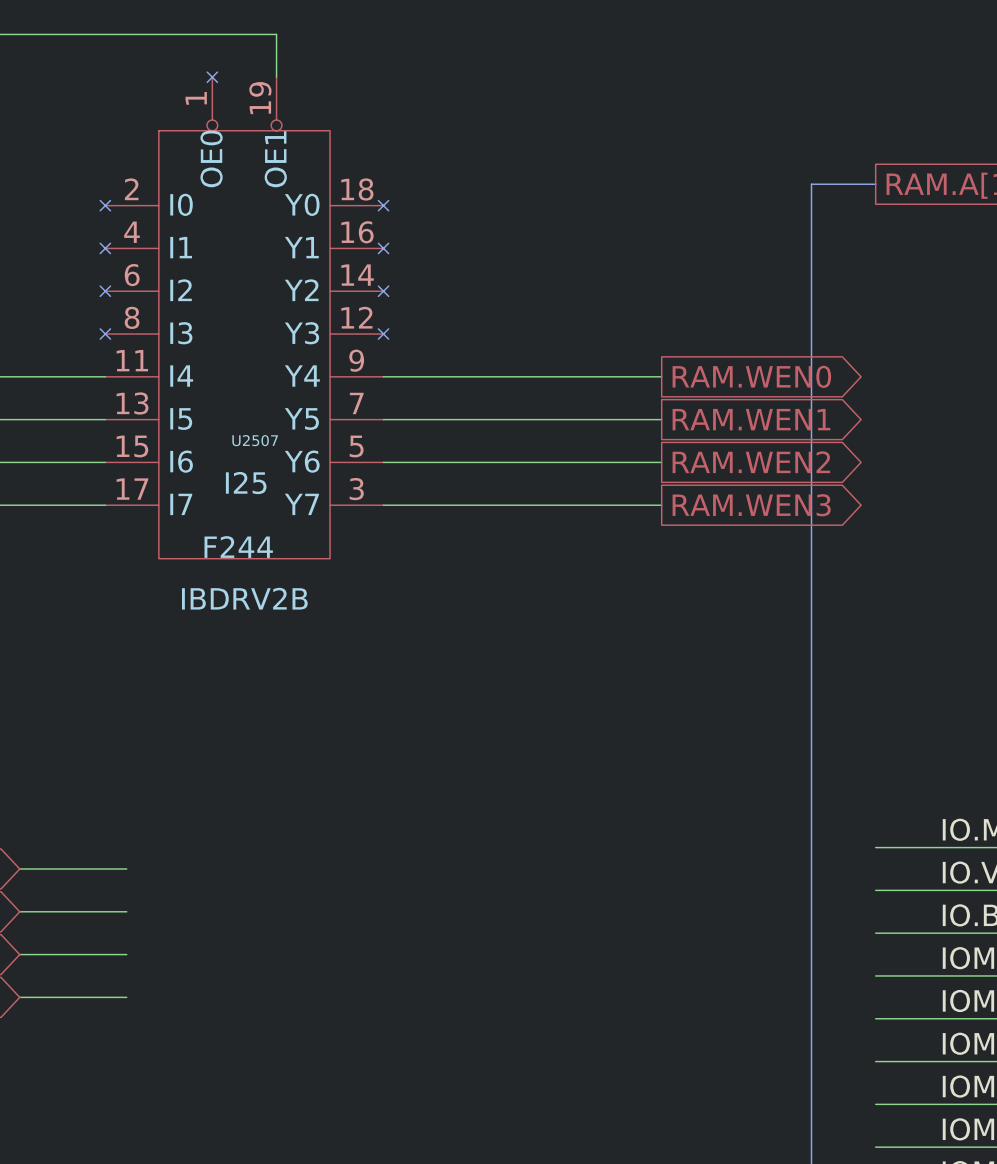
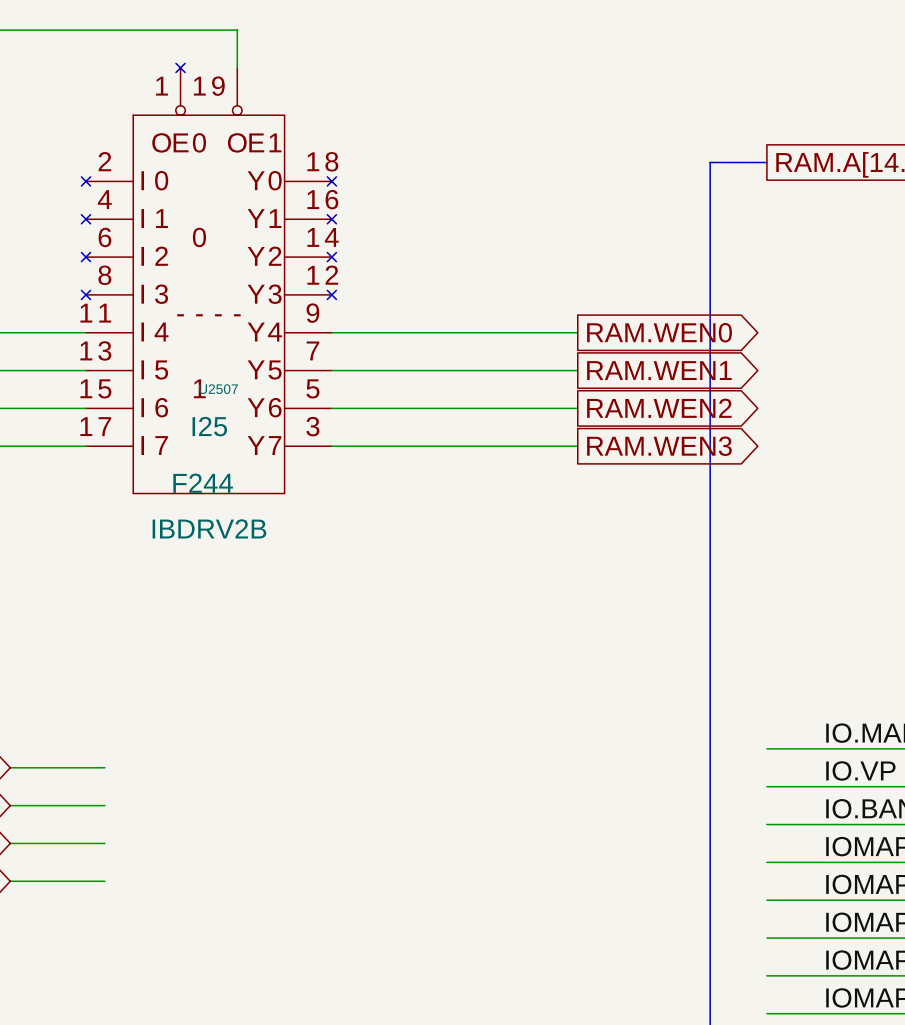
U2507 symbol: [105, 77, 384, 559] -> [85, 67, 332, 494]

